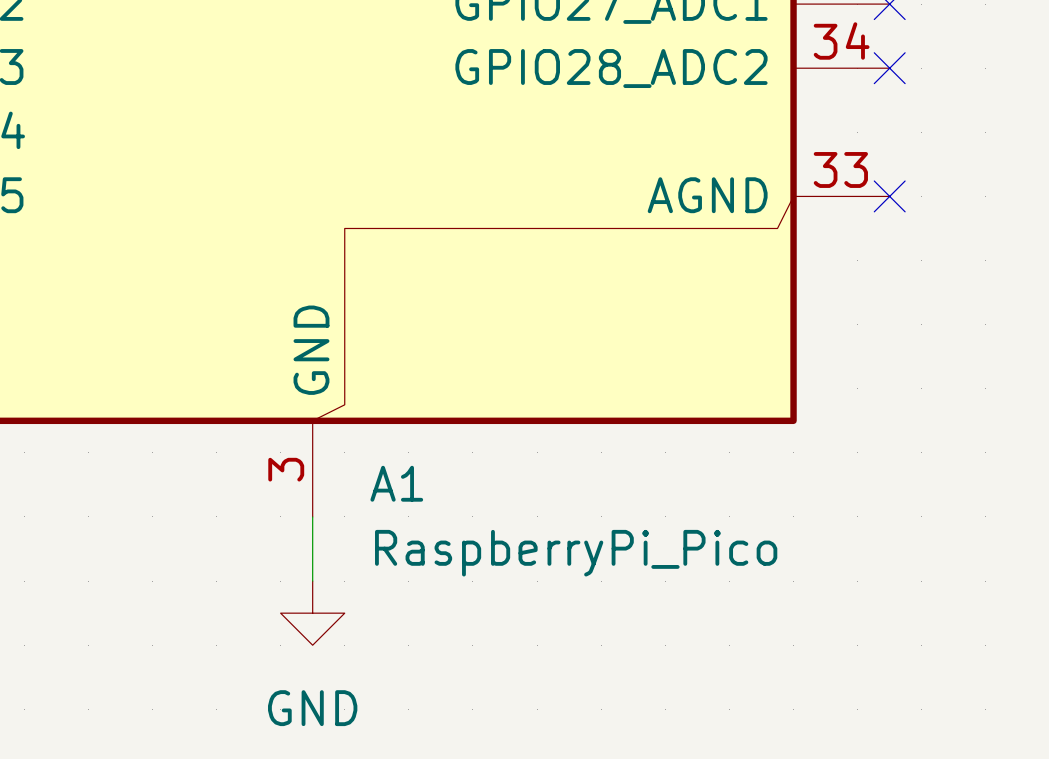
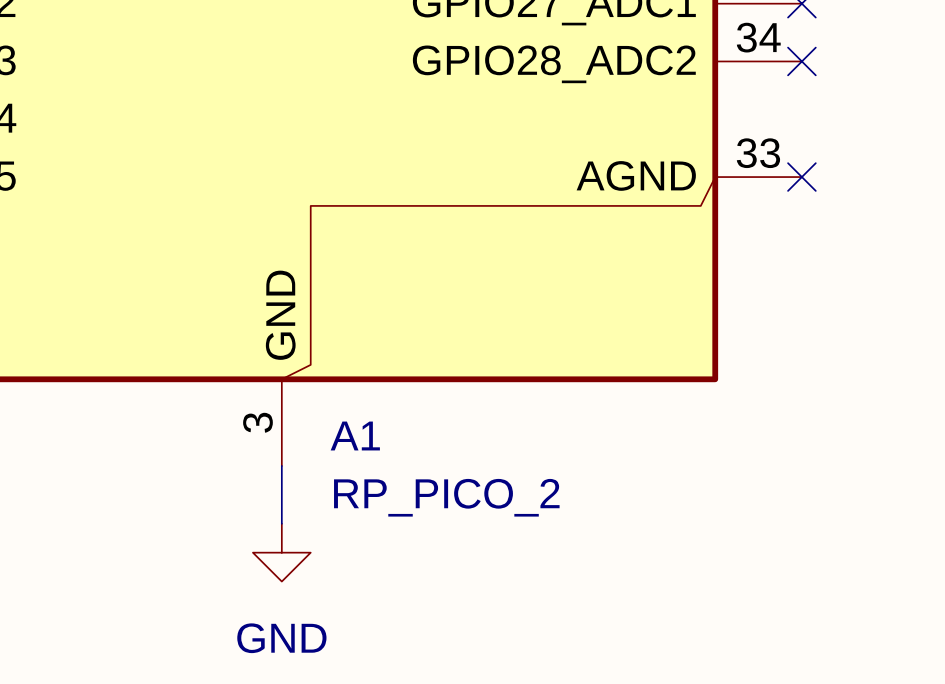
A1 value: RaspberryPi_Pico (576, 553) -> RP_PICO_2 (446, 497)

